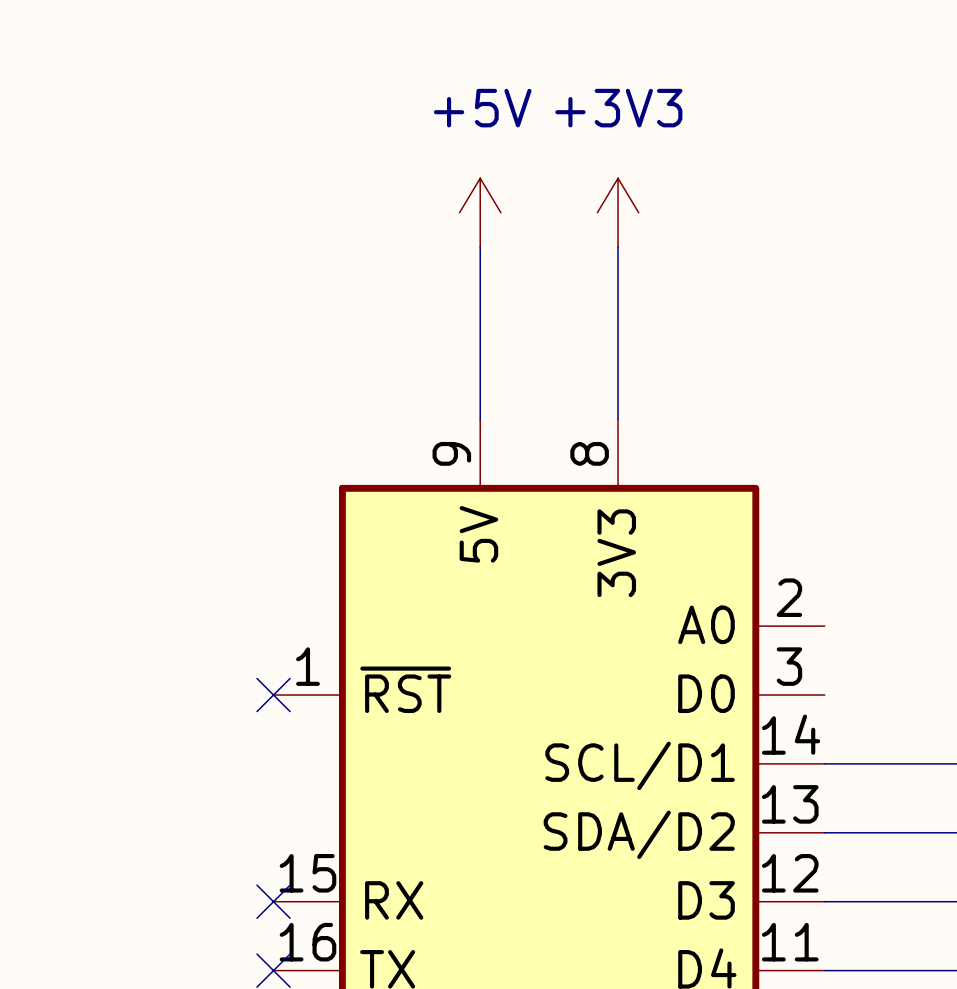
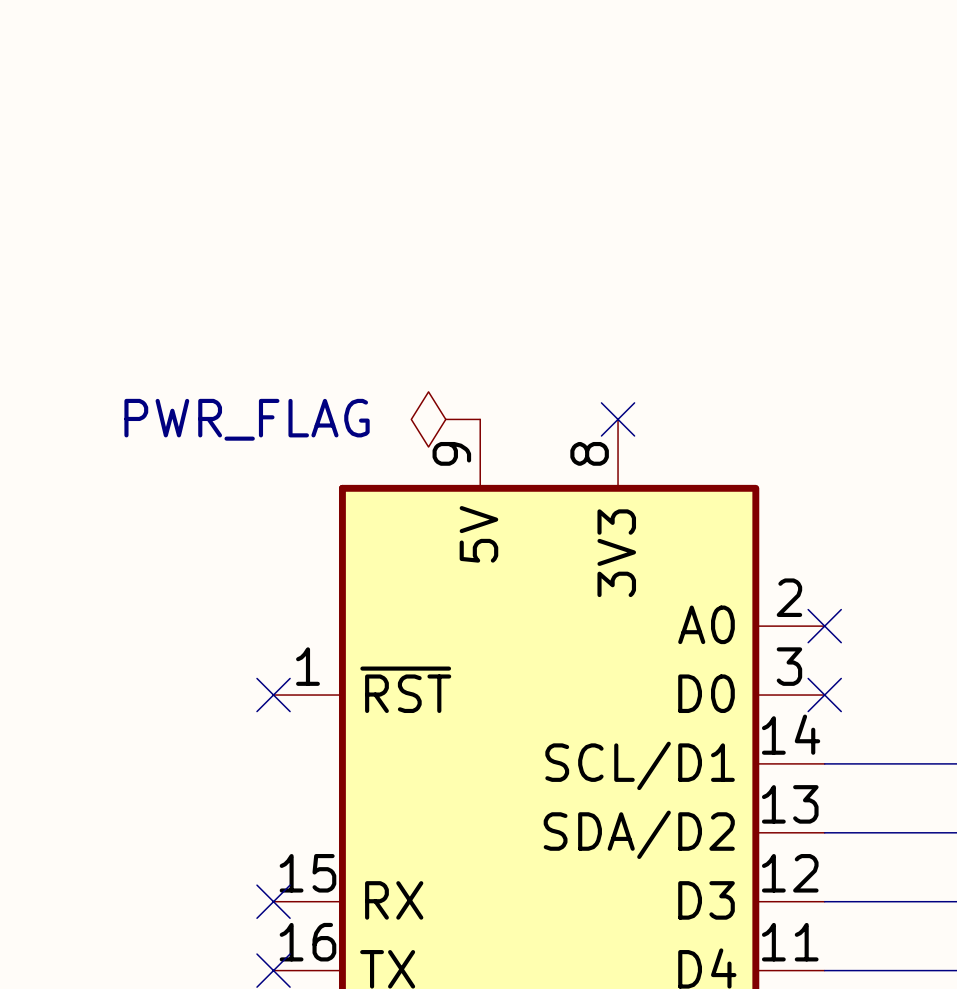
power symbol: +5V (480, 212) -> none
power symbol: +3V3 (618, 212) -> none
wire: (480, 247) (480, 419) -> none
wire: (618, 247) (618, 419) -> none
power symbol: none -> PWR_FLAG (445, 419)
no-connect mark: none -> (618, 419)
no-connect mark: none -> (824, 626)
no-connect mark: none -> (824, 695)

